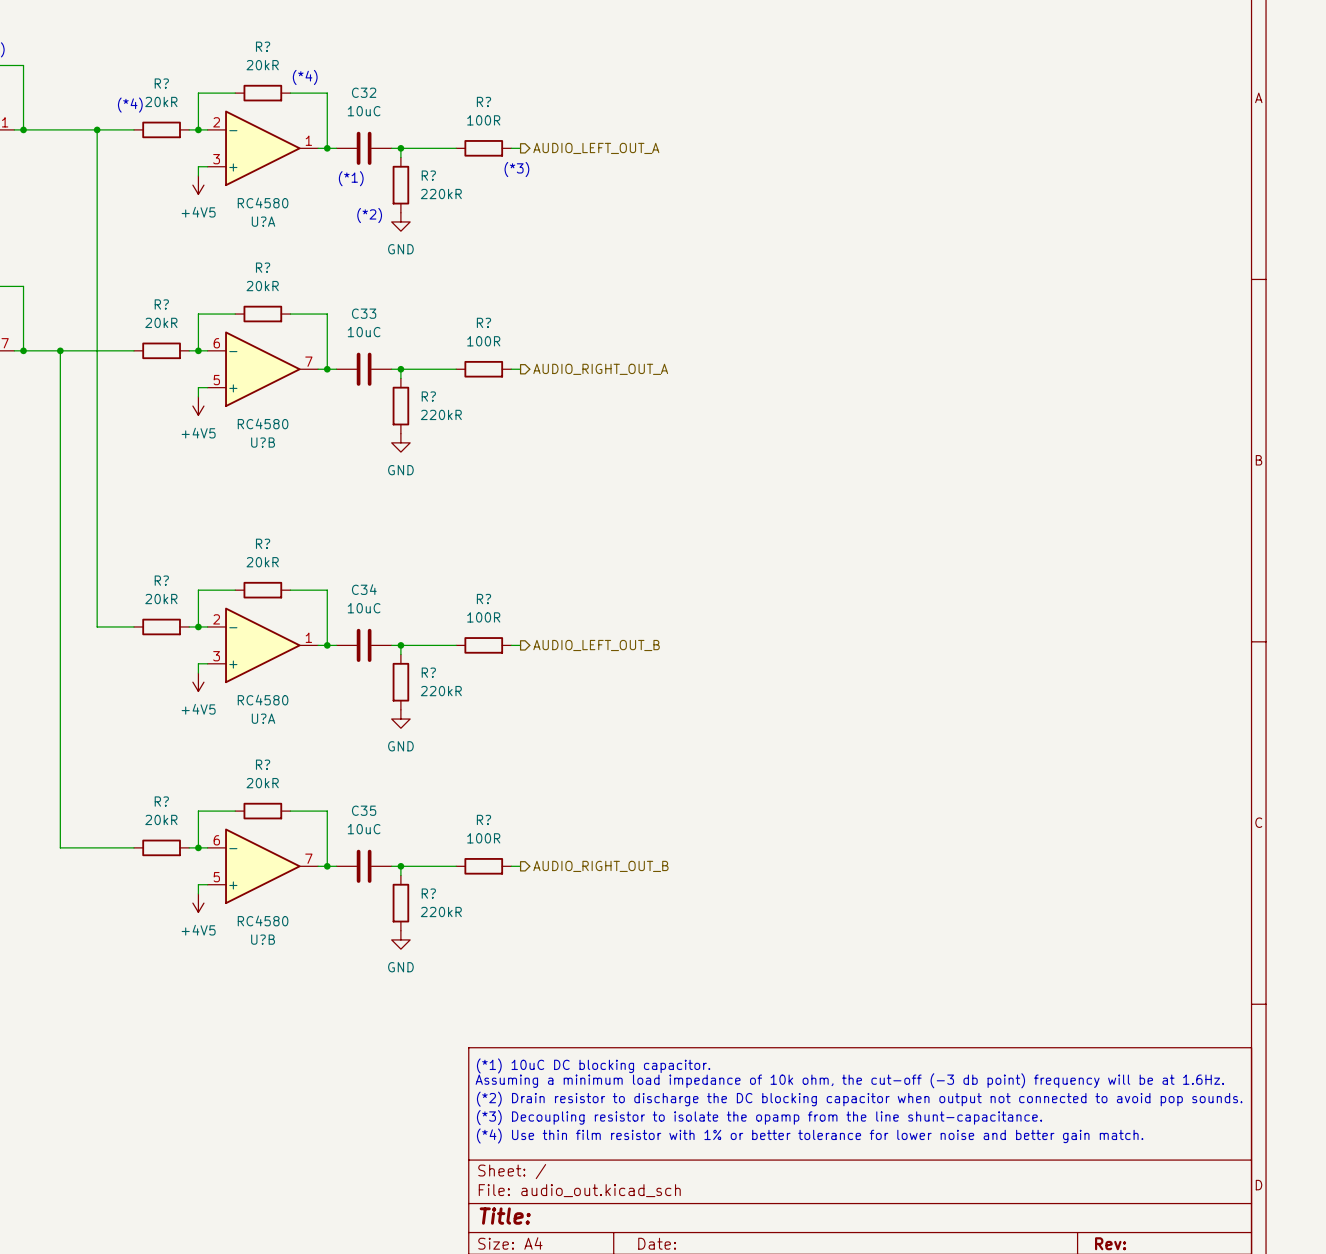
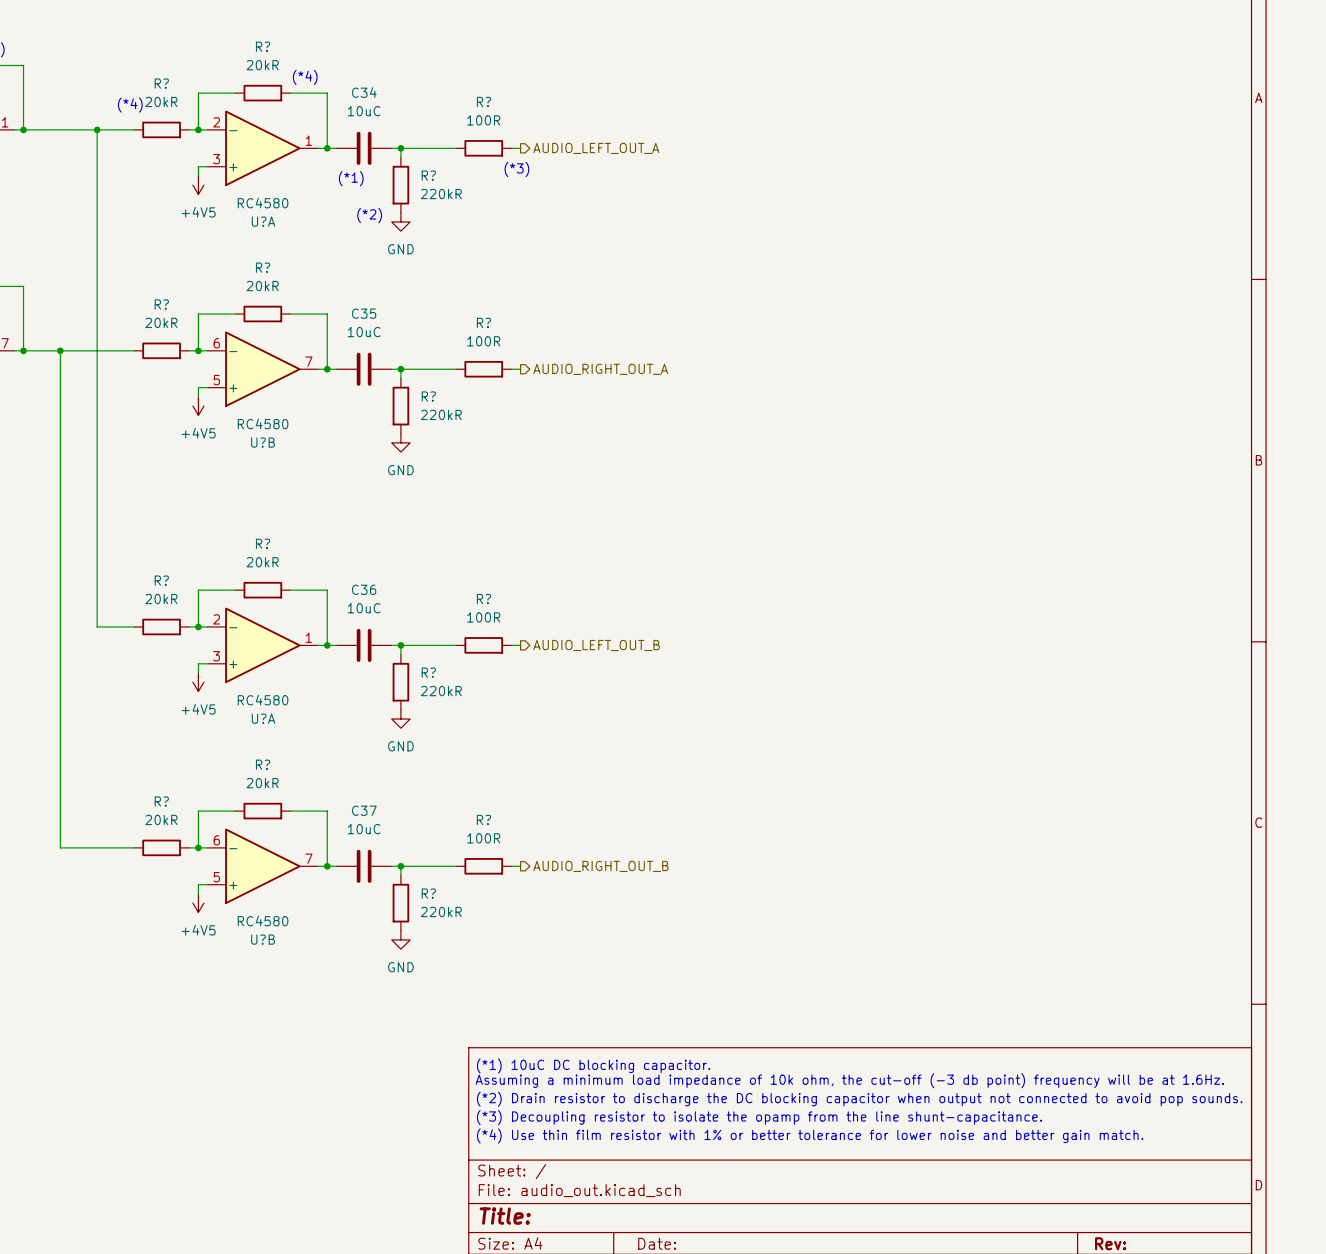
C32 name: C32 (364, 92) -> C34 (364, 92)
C33 name: C33 (364, 313) -> C35 (364, 313)
C34 name: C34 (364, 589) -> C36 (364, 589)
C35 name: C35 (364, 810) -> C37 (364, 810)

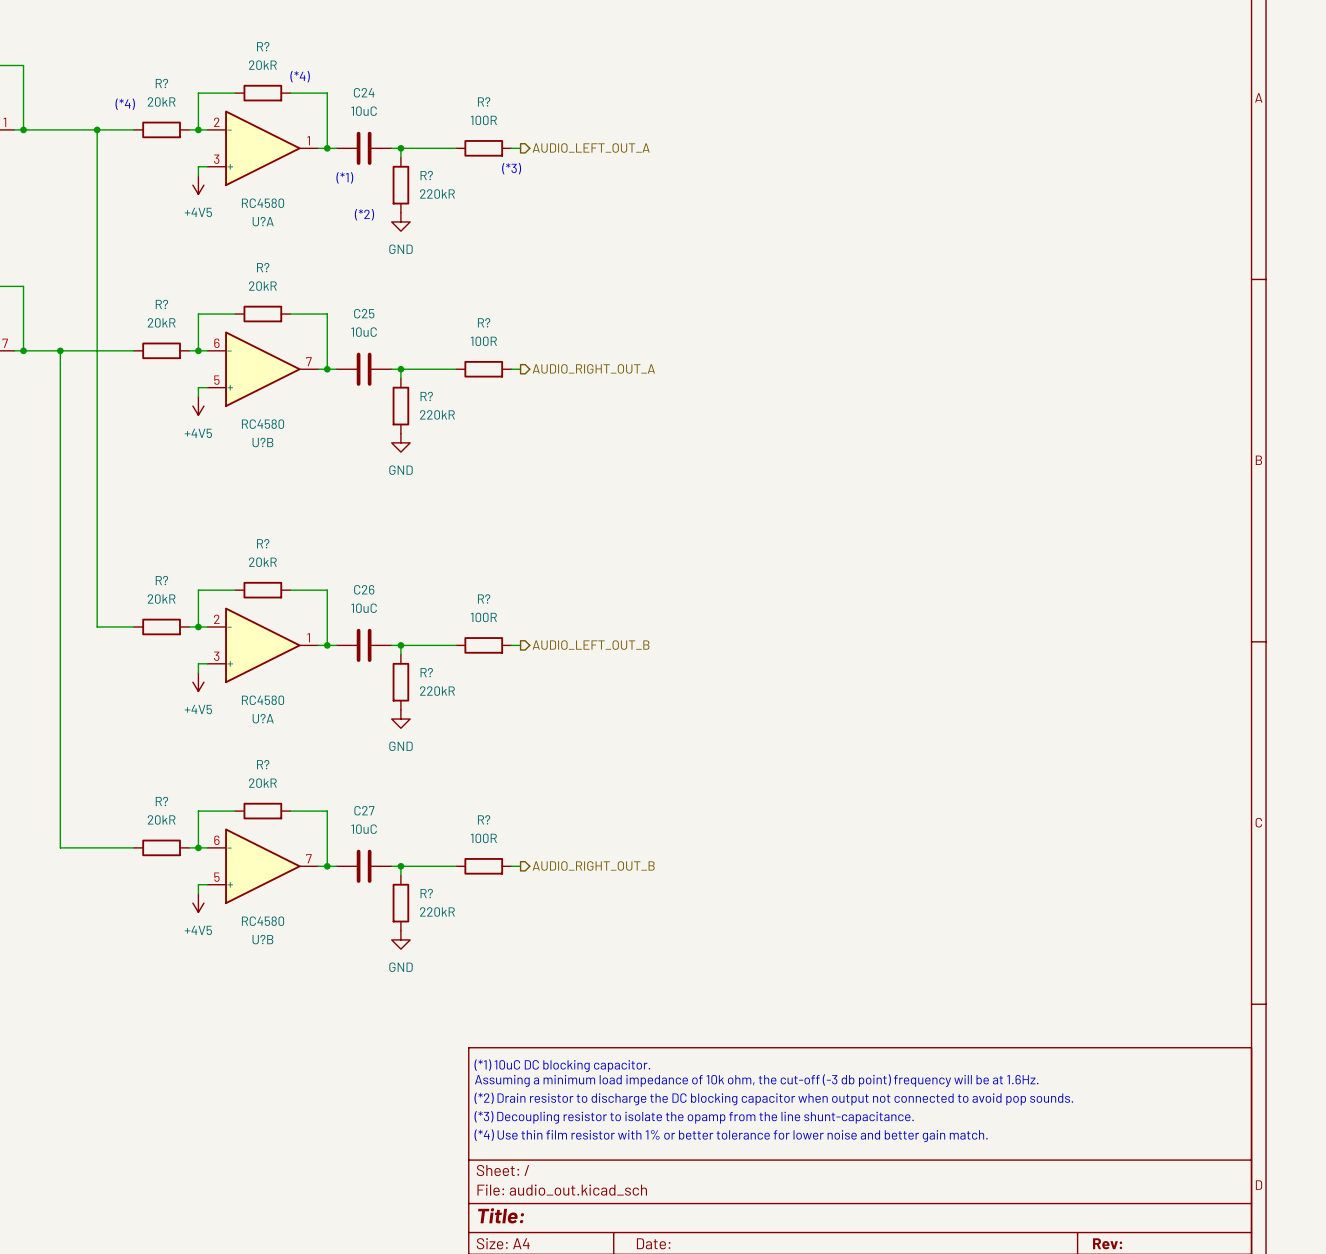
C34 name: C34 (364, 92) -> C24 (364, 92)
C35 name: C35 (364, 313) -> C25 (364, 313)
C36 name: C36 (364, 589) -> C26 (364, 589)
C37 name: C37 (364, 810) -> C27 (364, 810)

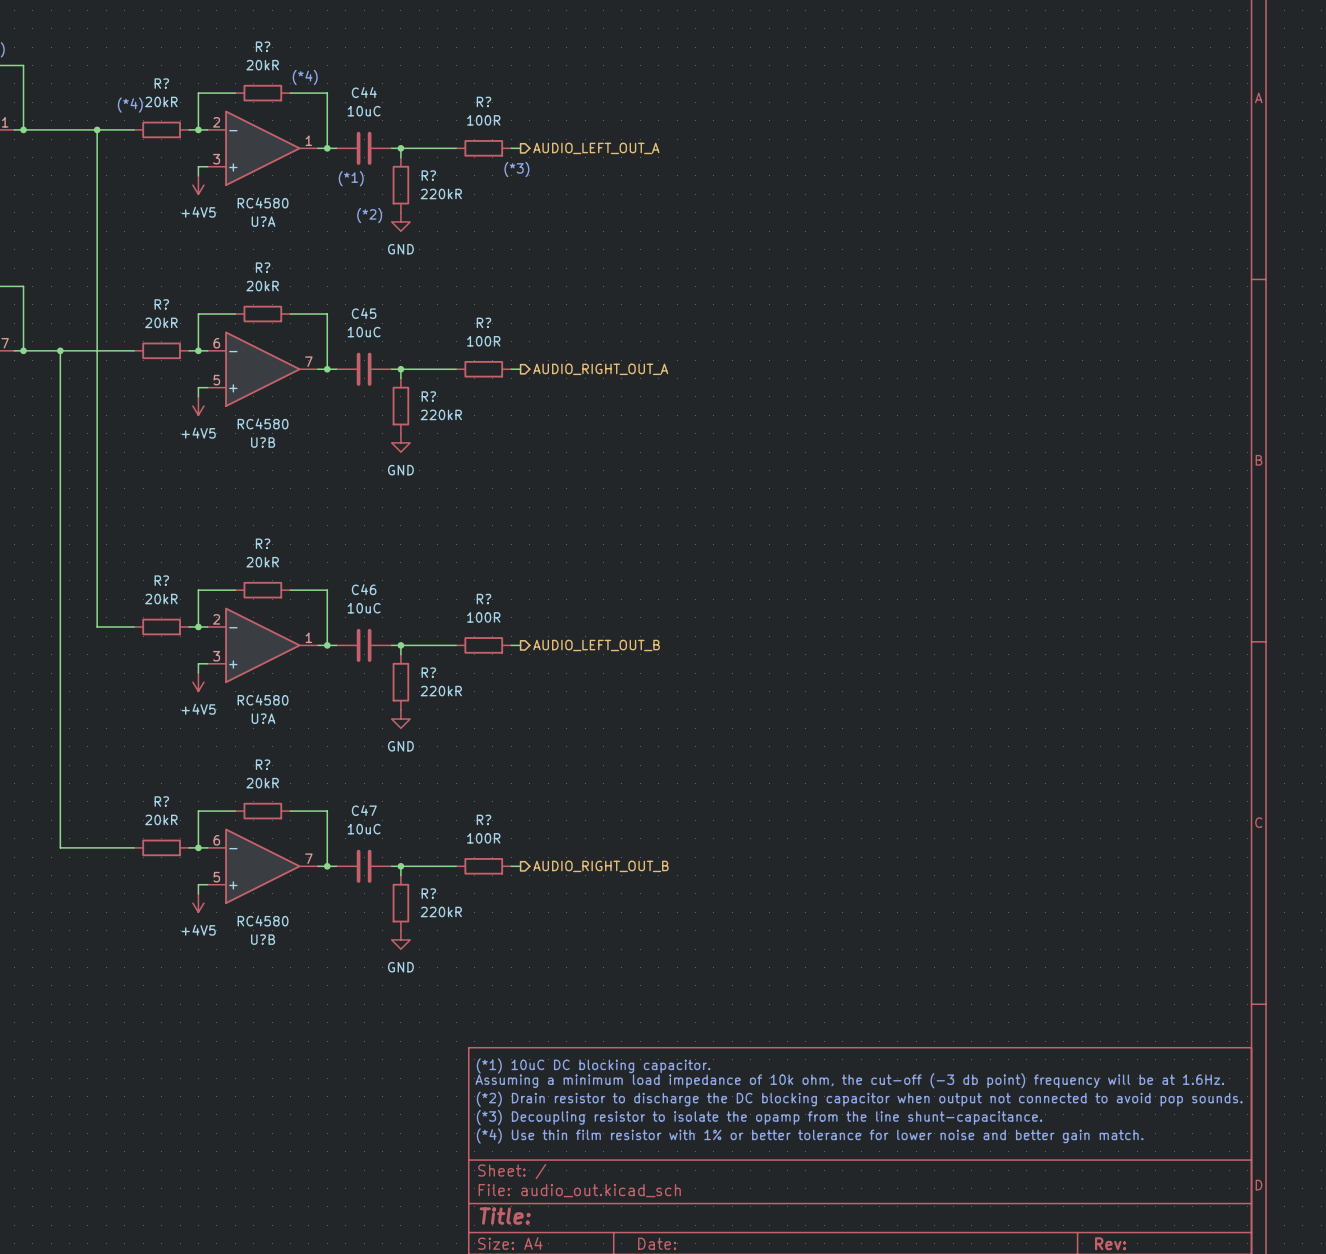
C24 name: C24 (364, 92) -> C44 (364, 92)
C25 name: C25 (364, 313) -> C45 (364, 313)
C26 name: C26 (364, 589) -> C46 (364, 589)
C27 name: C27 (364, 810) -> C47 (364, 810)

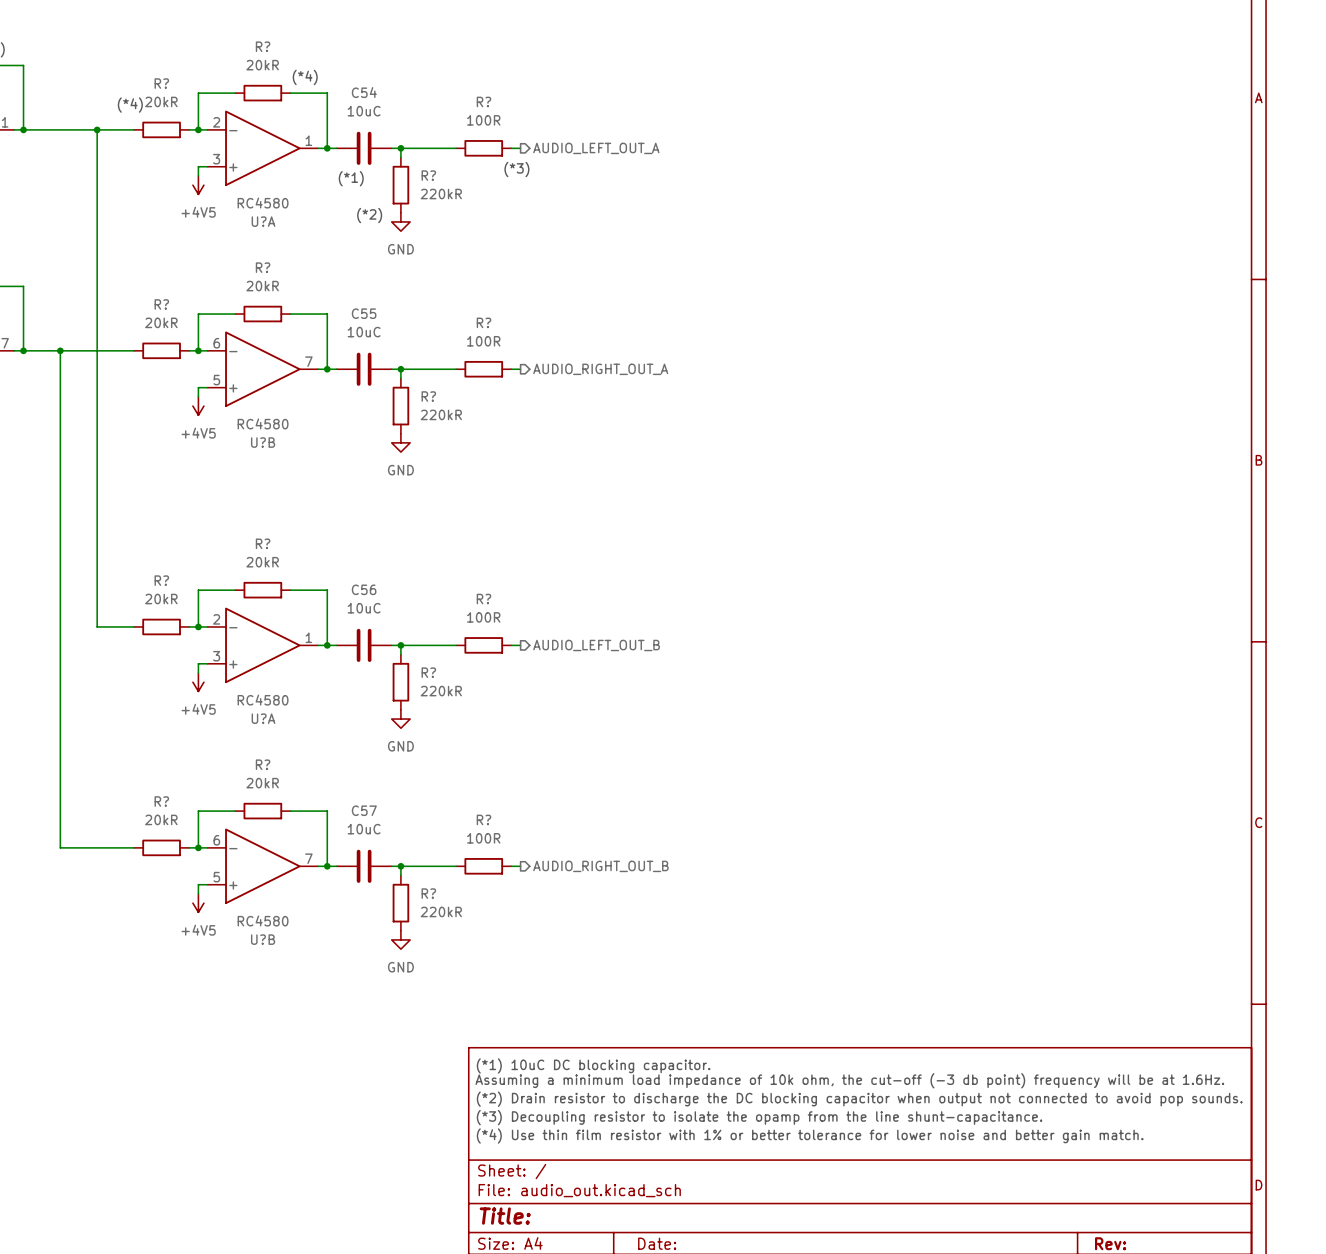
C44 name: C44 (364, 92) -> C54 (364, 92)
C45 name: C45 (364, 313) -> C55 (364, 313)
C46 name: C46 (364, 589) -> C56 (364, 589)
C47 name: C47 (364, 810) -> C57 (364, 810)

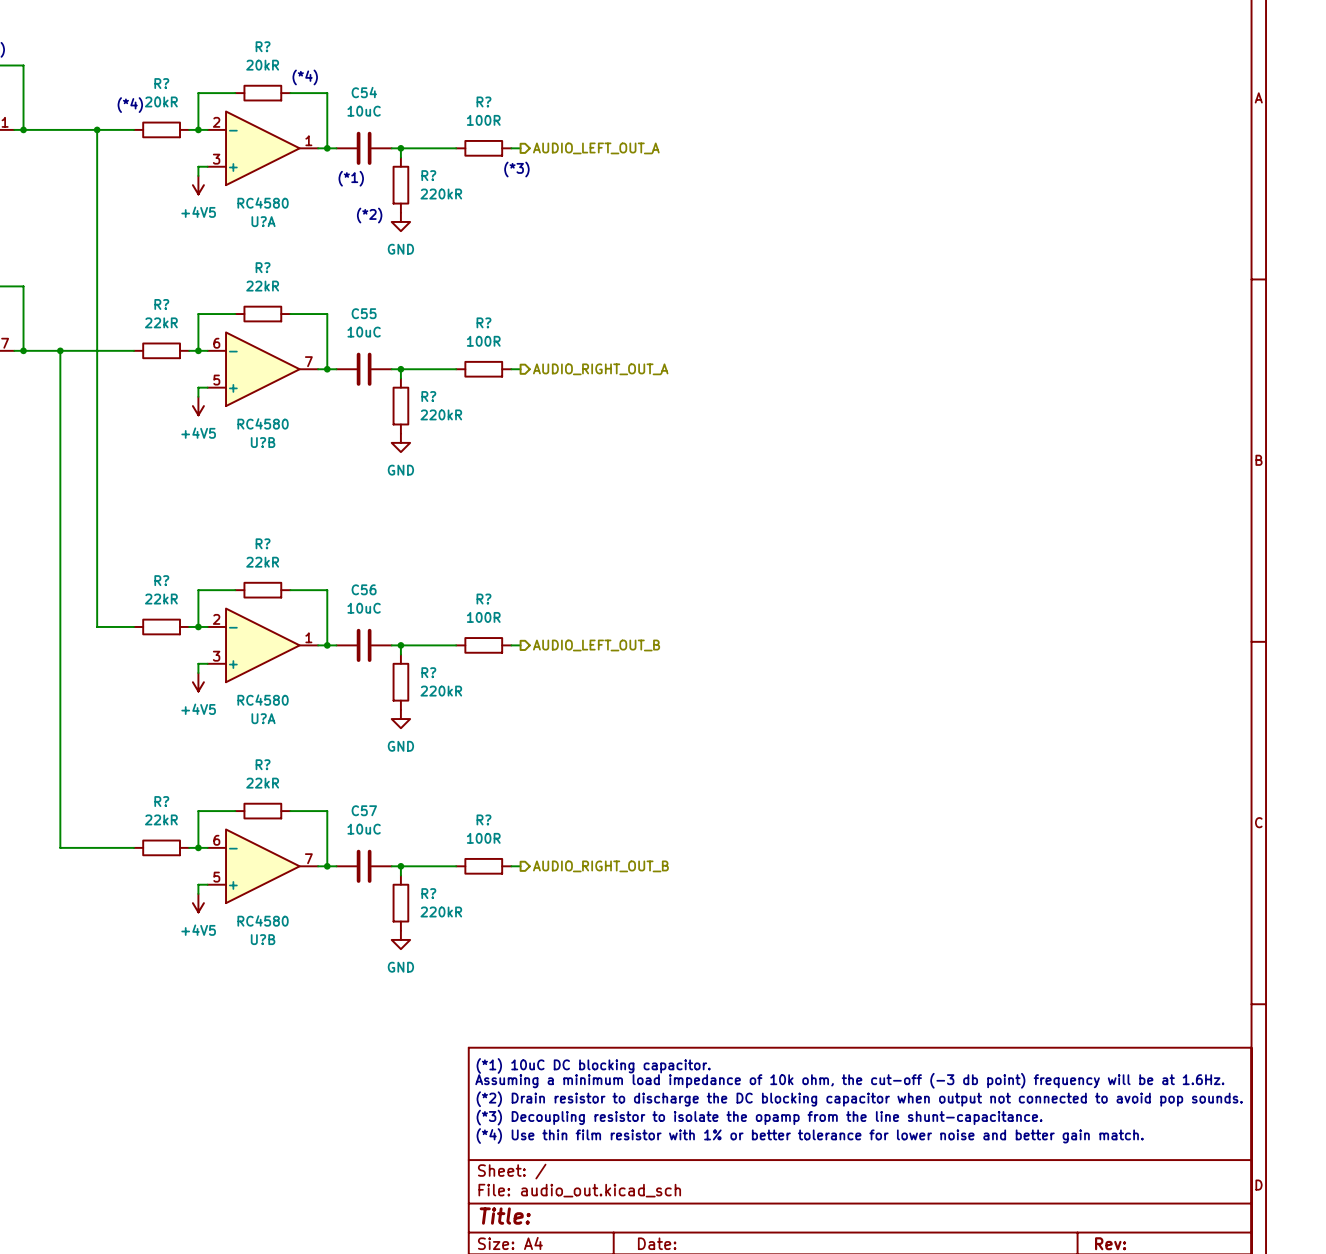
R? value: 20kR (262, 286) -> 22kR (262, 286)
R? value: 20kR (161, 322) -> 22kR (161, 322)
R? value: 20kR (262, 562) -> 22kR (262, 562)
R? value: 20kR (161, 599) -> 22kR (161, 599)
R? value: 20kR (262, 783) -> 22kR (262, 783)
R? value: 20kR (161, 819) -> 22kR (161, 819)

